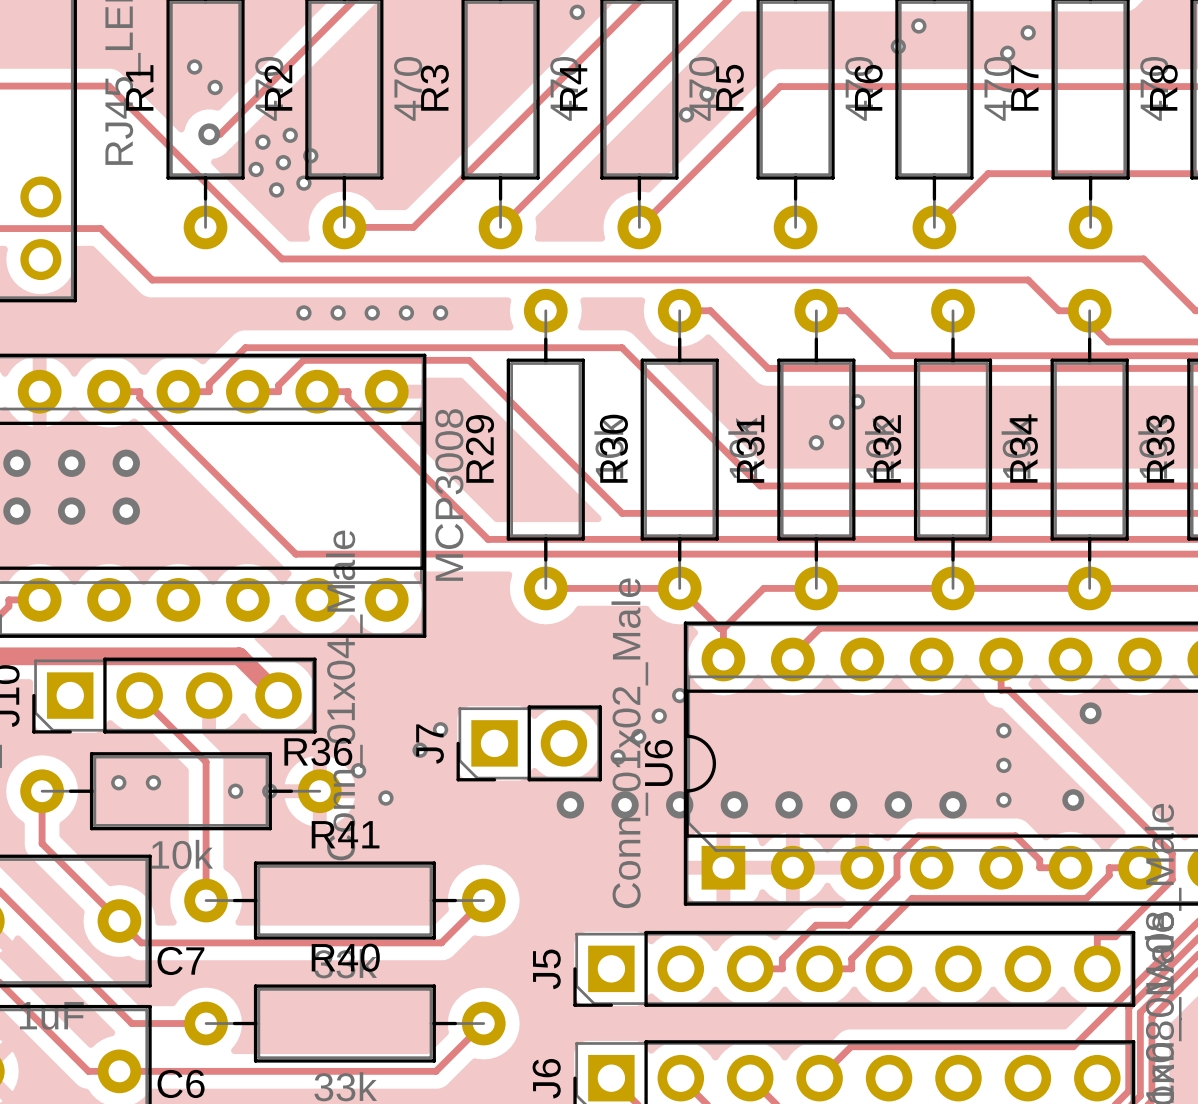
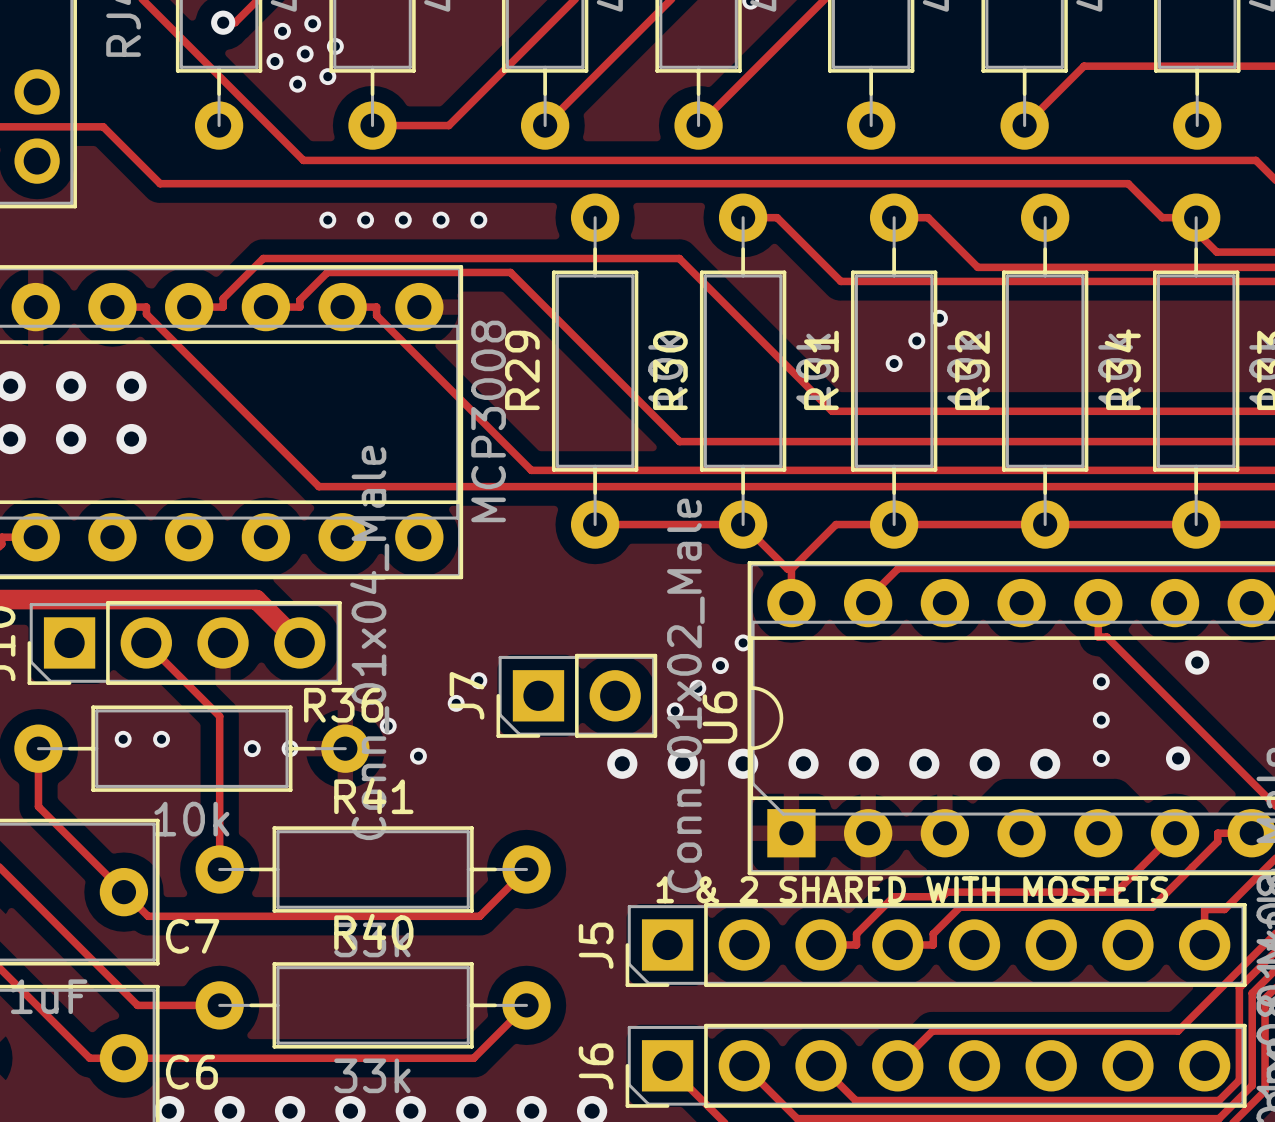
track: (1070, 867) (1039, 867) (1039, 860) (1015, 835) (918, 835) (896, 857) (896, 877) (848, 925) -> (1175, 833) (1116, 892) (947, 892) (942, 896) (930, 896)
track: (1086, 898) (912, 898) (851, 958) -> (1192, 867) (1152, 907) (959, 907) (933, 933)
text: none -> 1 & 2 SHARED WITH MOSFETS (912, 889)

